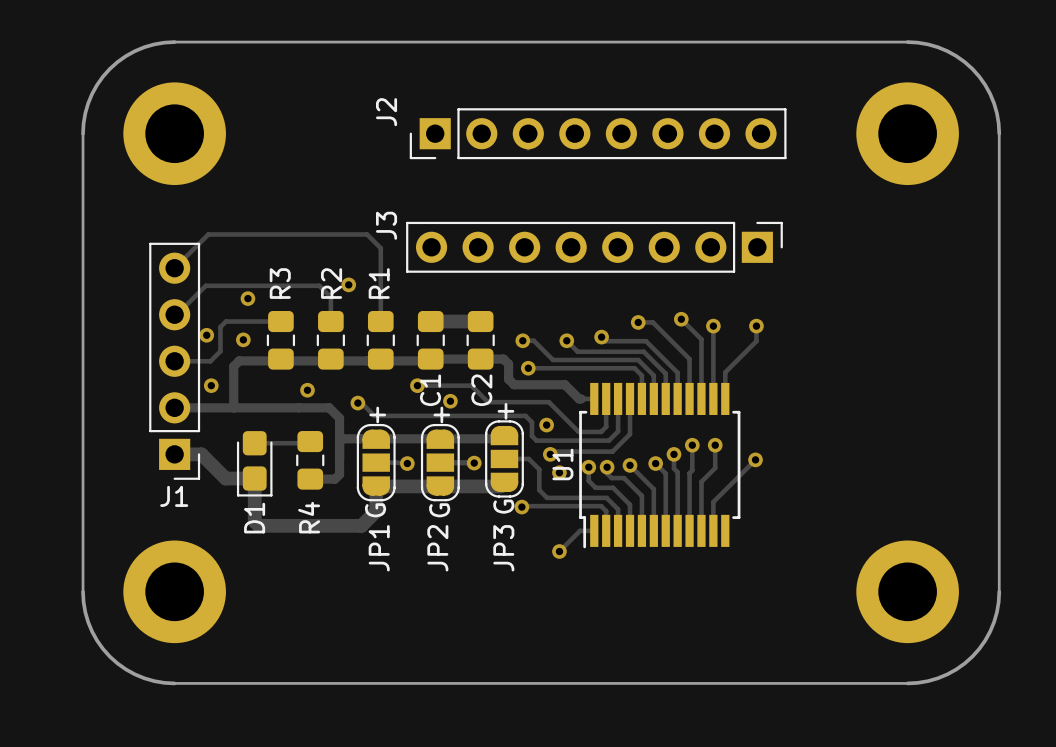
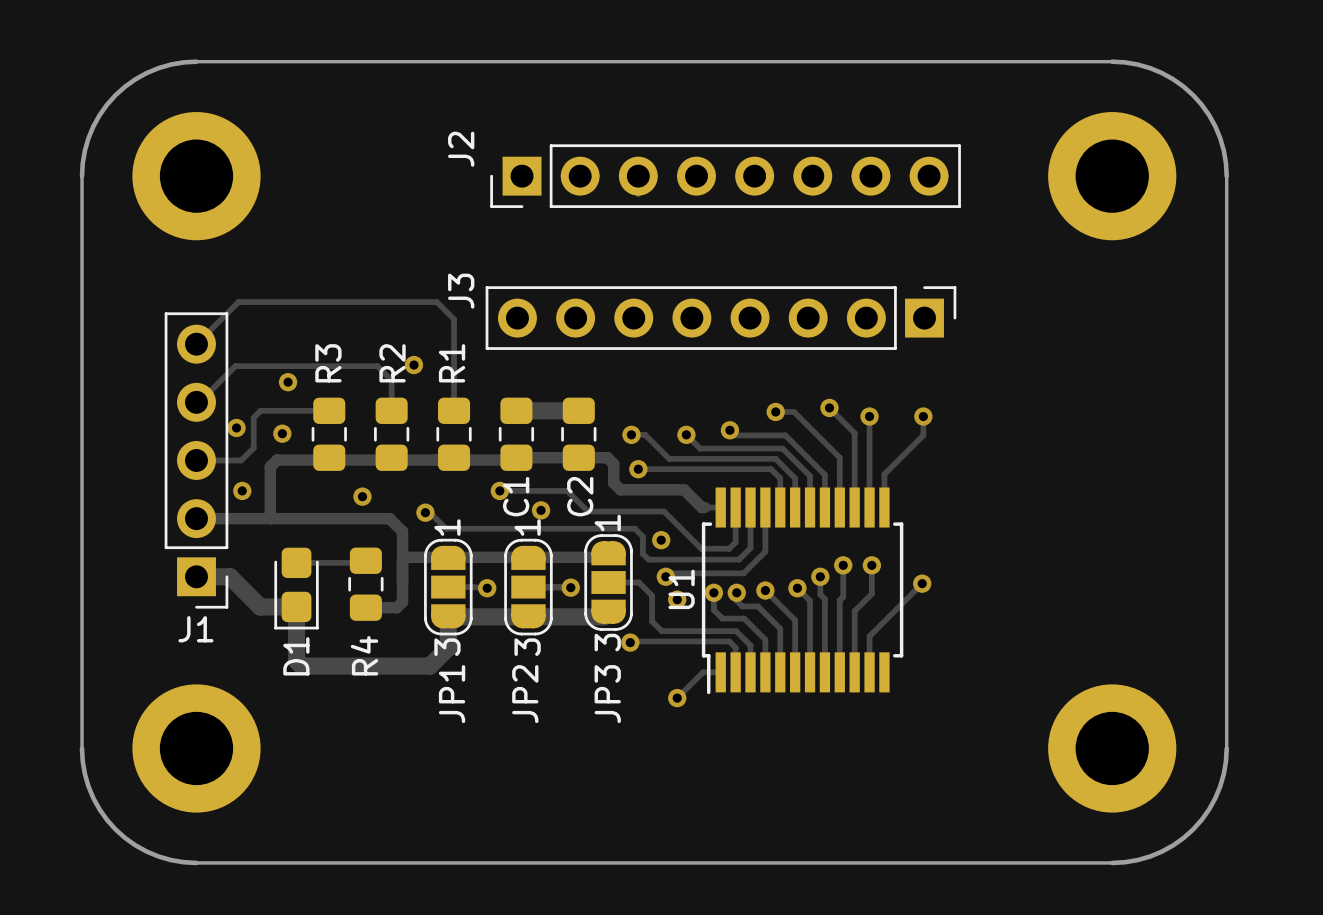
JP3 text: + (505, 411) -> 1 (607, 522)
JP1 text: + (377, 414) -> 1 (447, 527)
JP2 text: + (441, 414) -> 1 (527, 527)
JP3 text: G (503, 506) -> 3 (607, 642)
JP1 text: G (375, 510) -> 3 (447, 647)
JP2 text: G (439, 510) -> 3 (527, 647)

